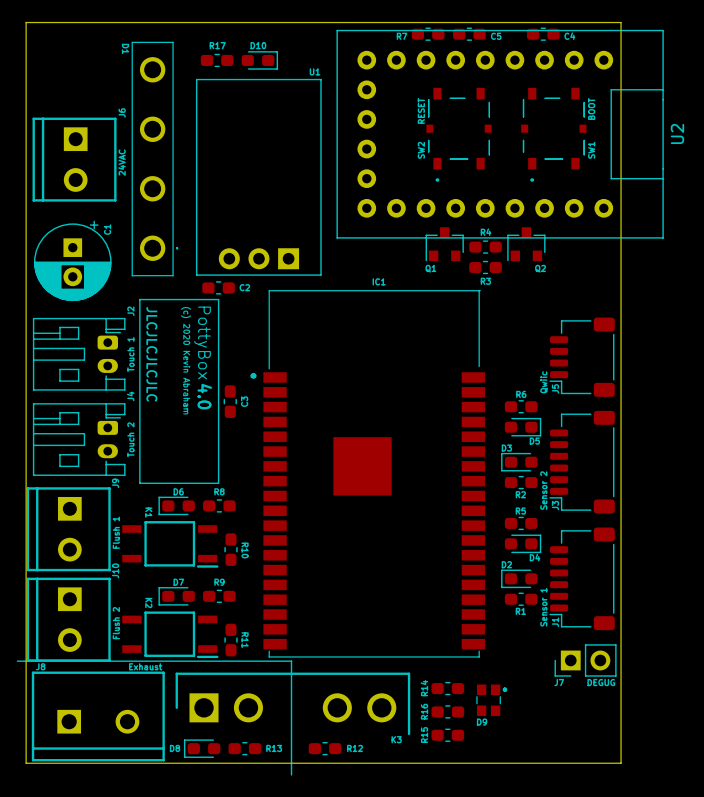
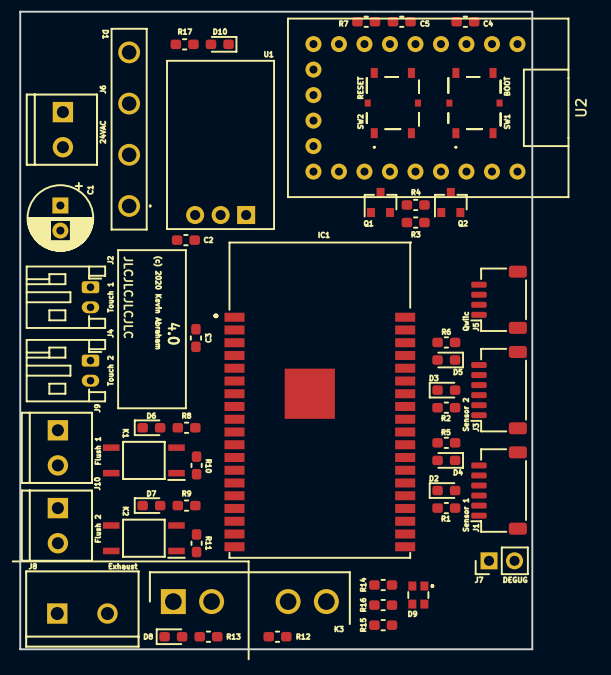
text: PottyBox (202, 342) -> none

